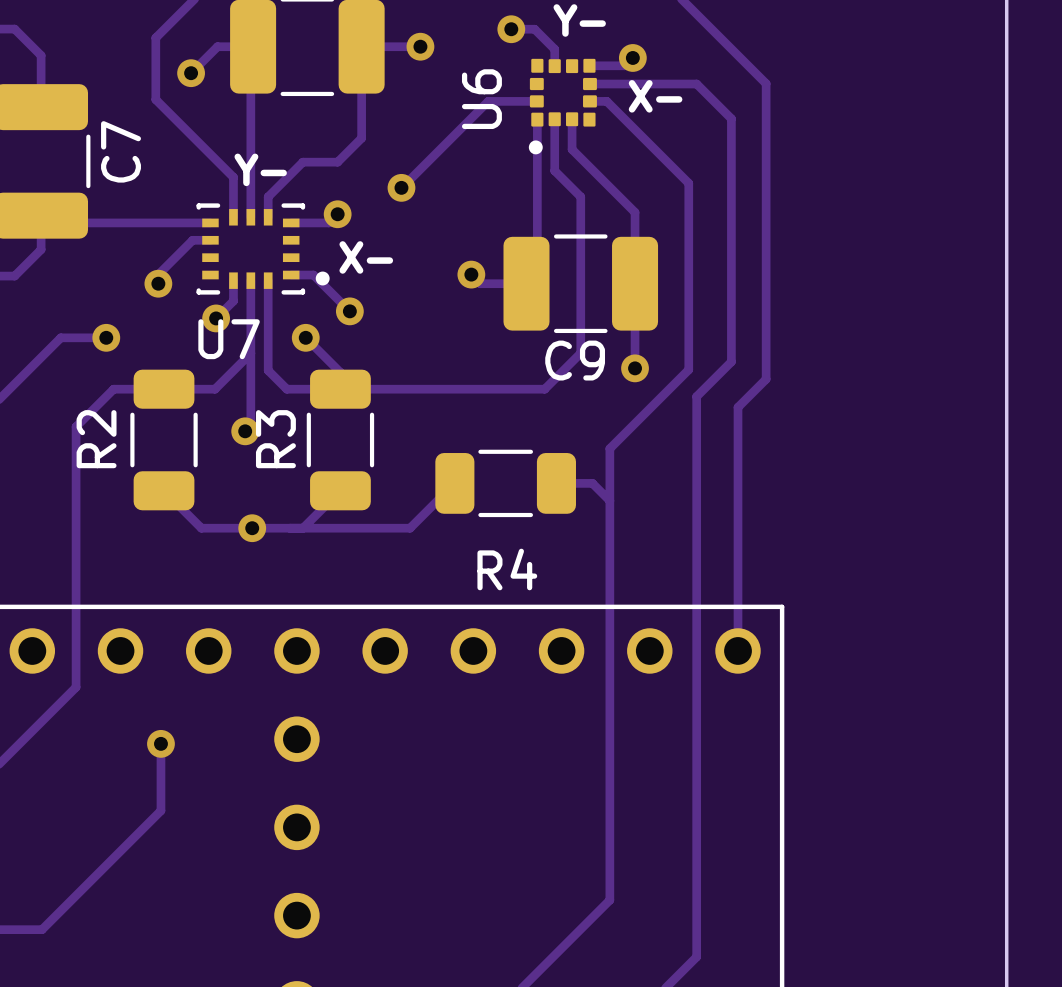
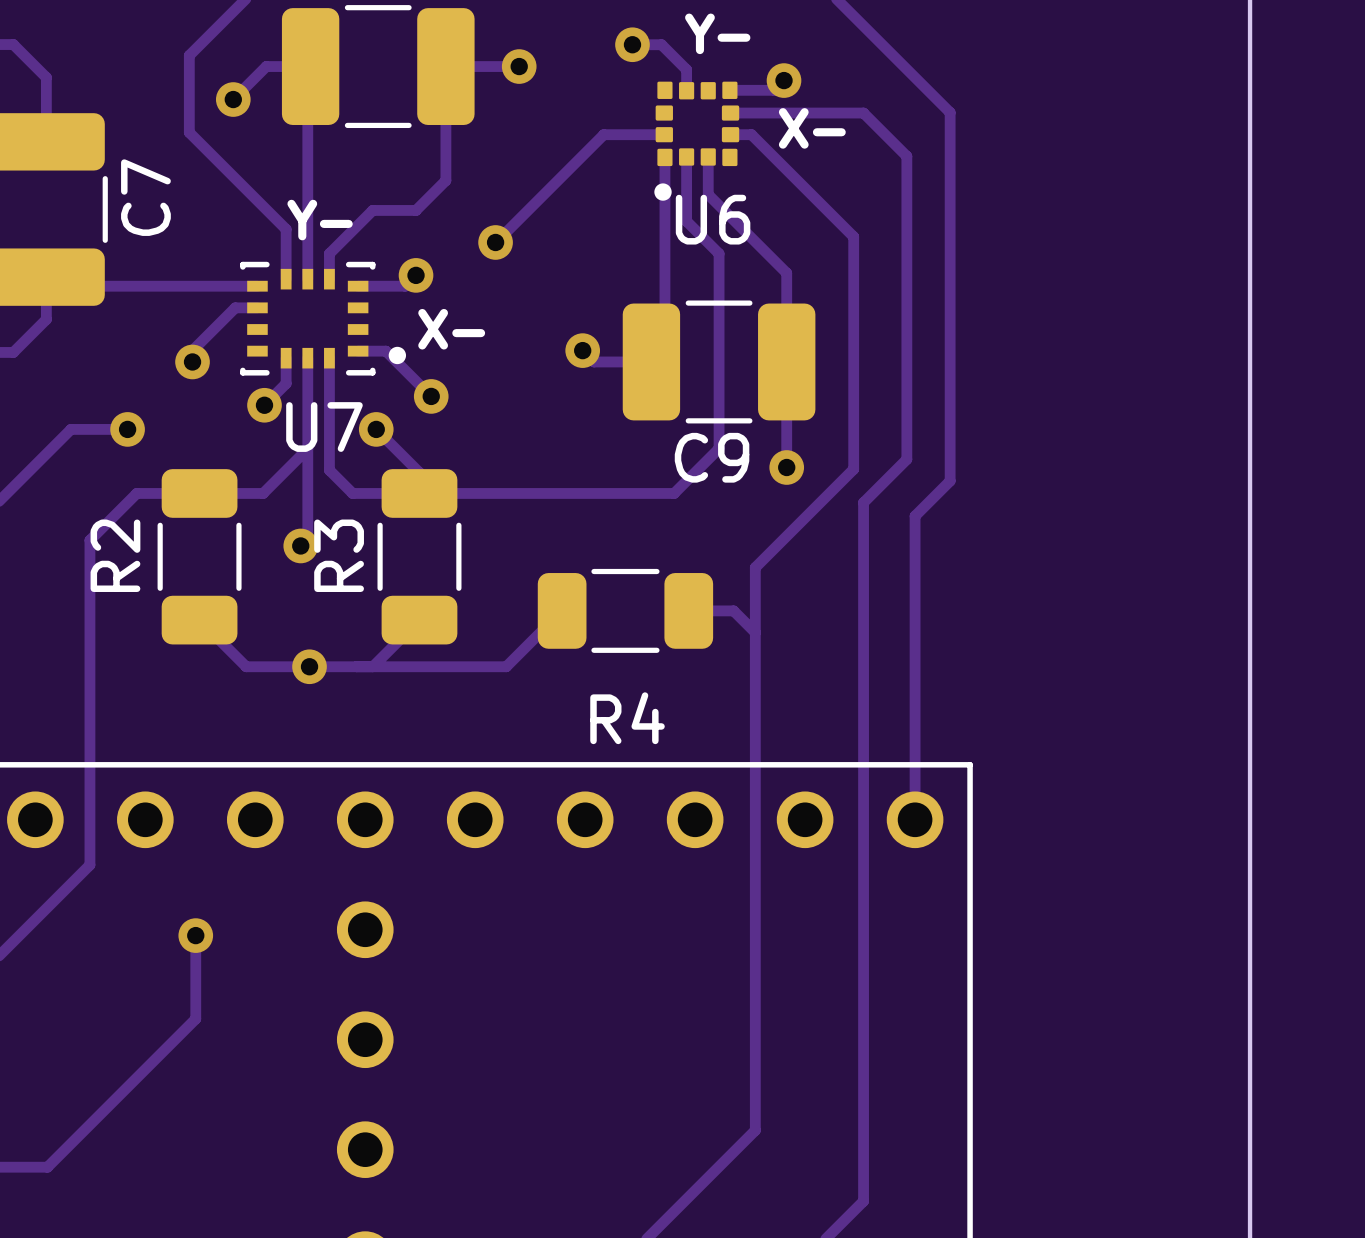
U6 name rotation: 0° (481, 99) -> 90° clockwise (713, 219)
U6 name position: U6 (481, 99) -> U6 (713, 219)
U7 name position: U7 (229, 339) -> U7 (324, 427)

